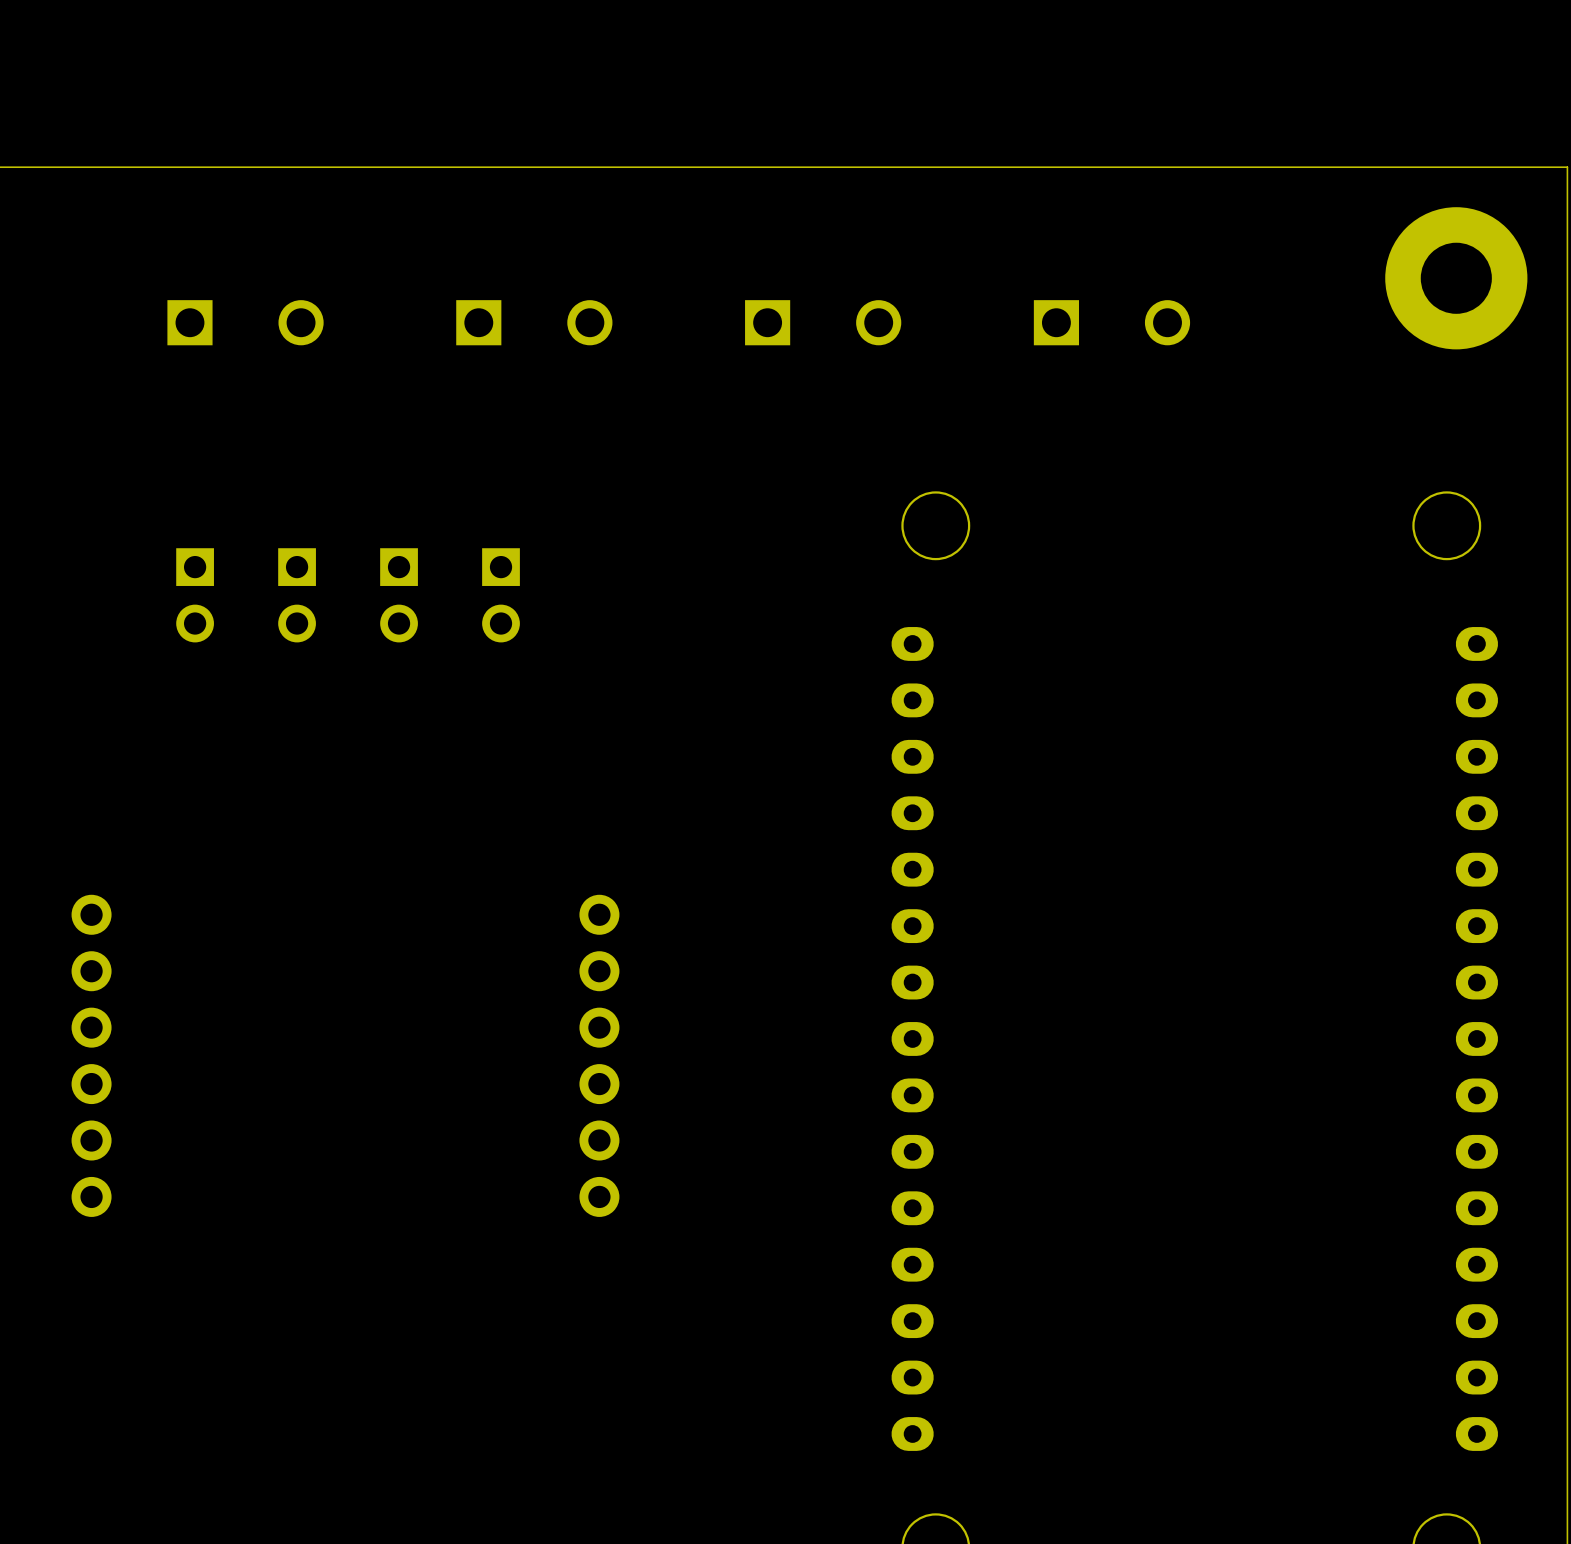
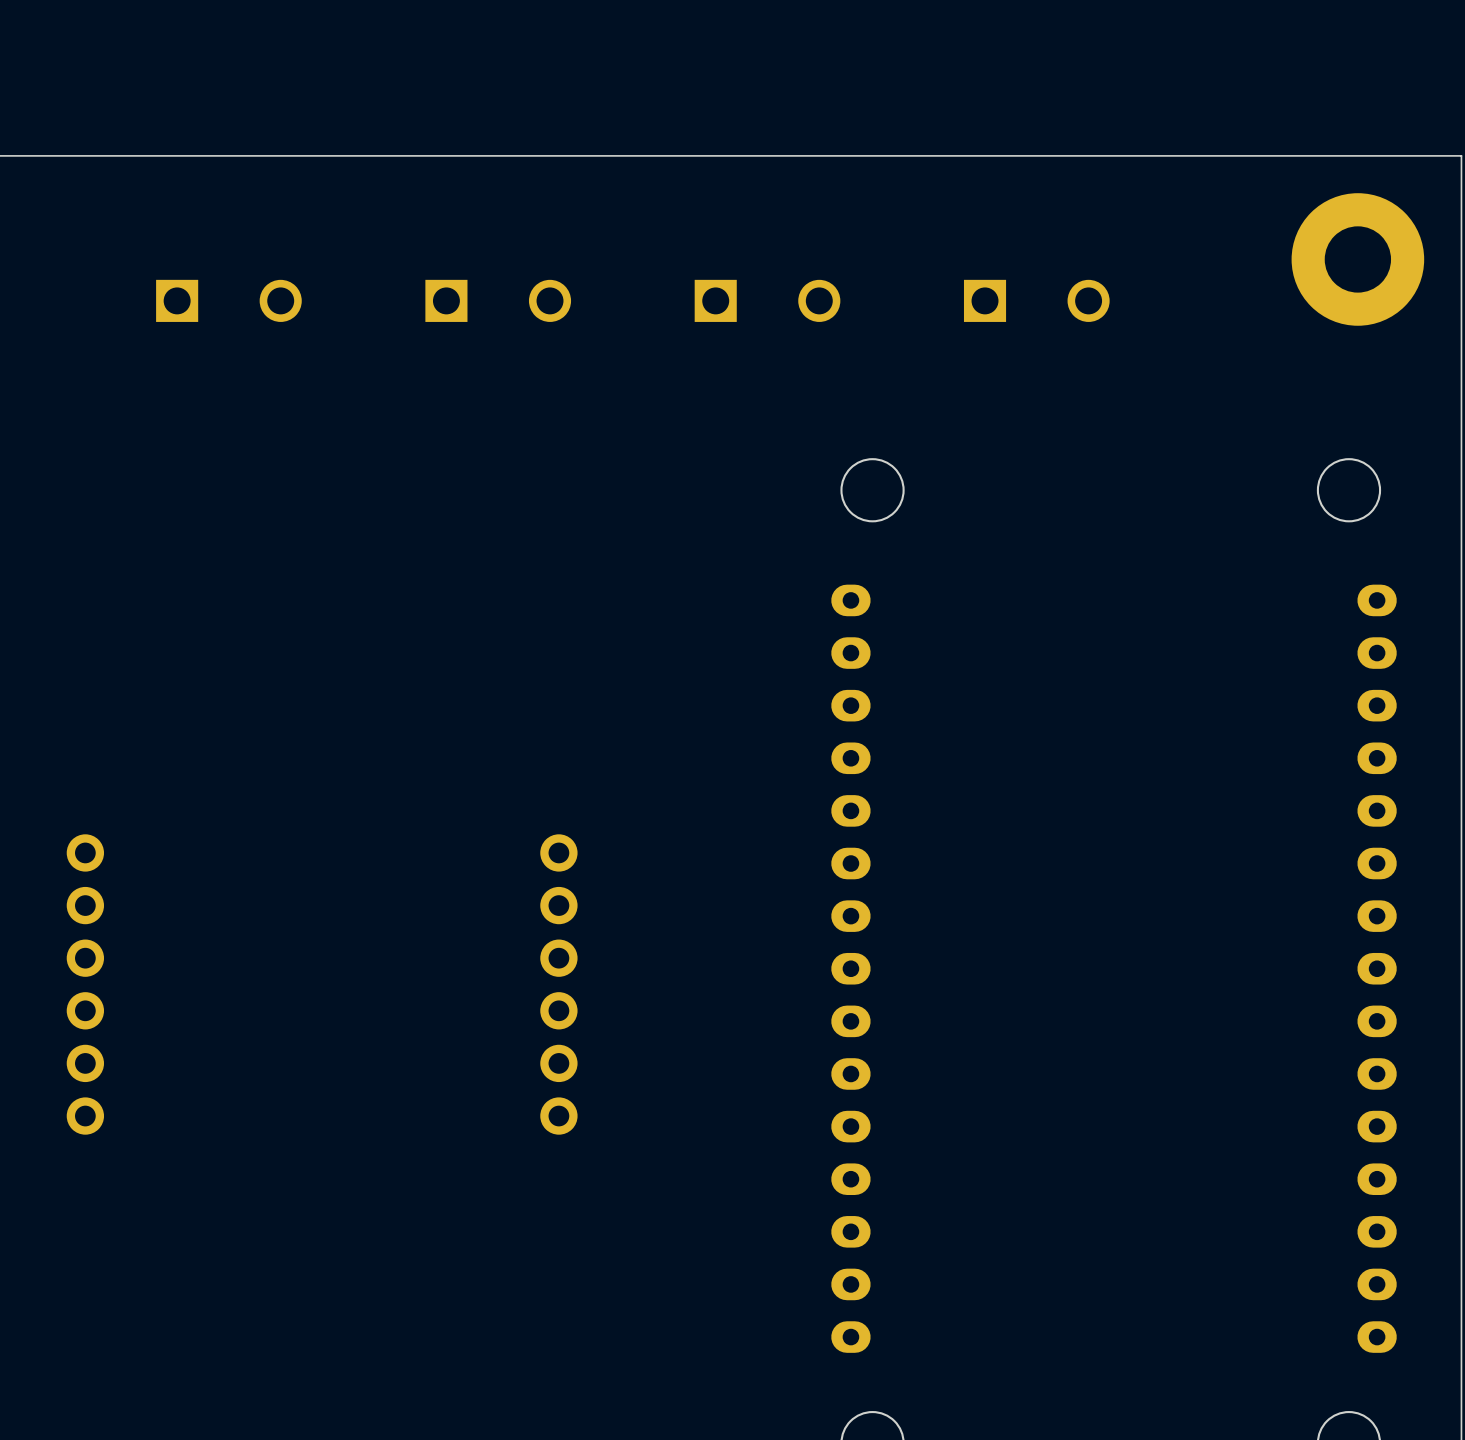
part: (195, 595) -> none
part: (297, 595) -> none
part: (399, 595) -> none
part: (501, 595) -> none

